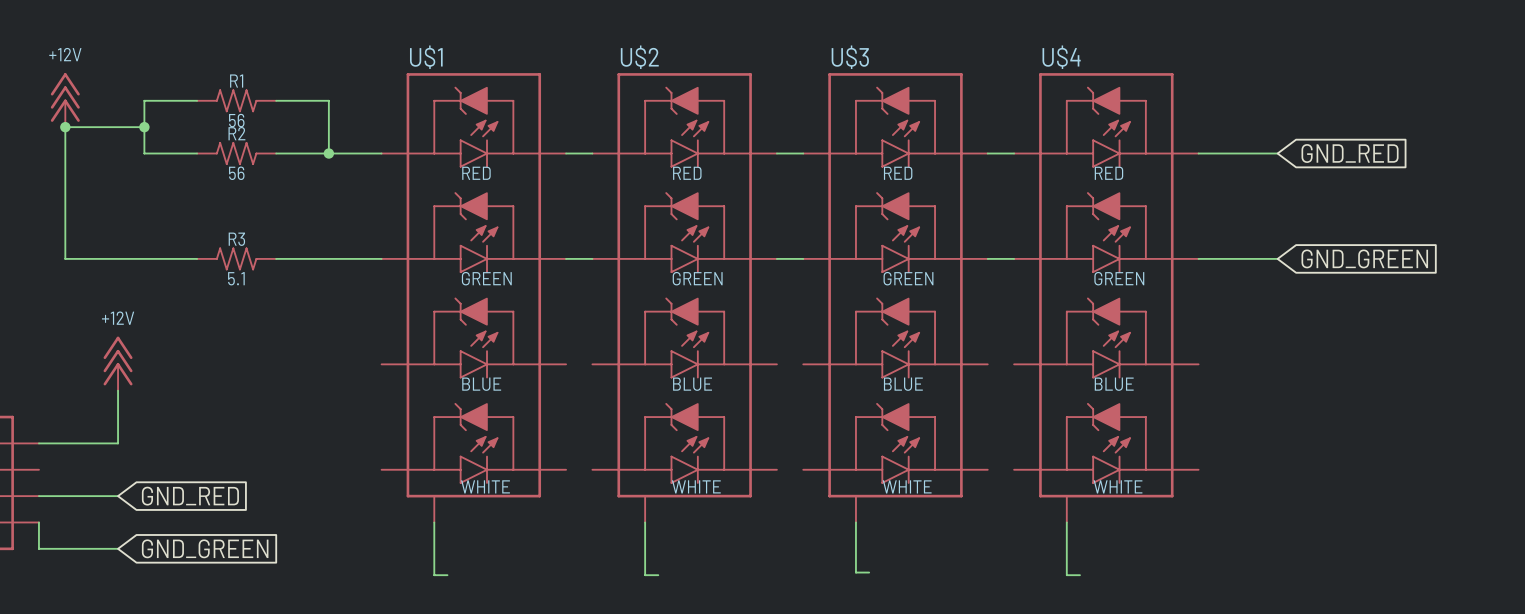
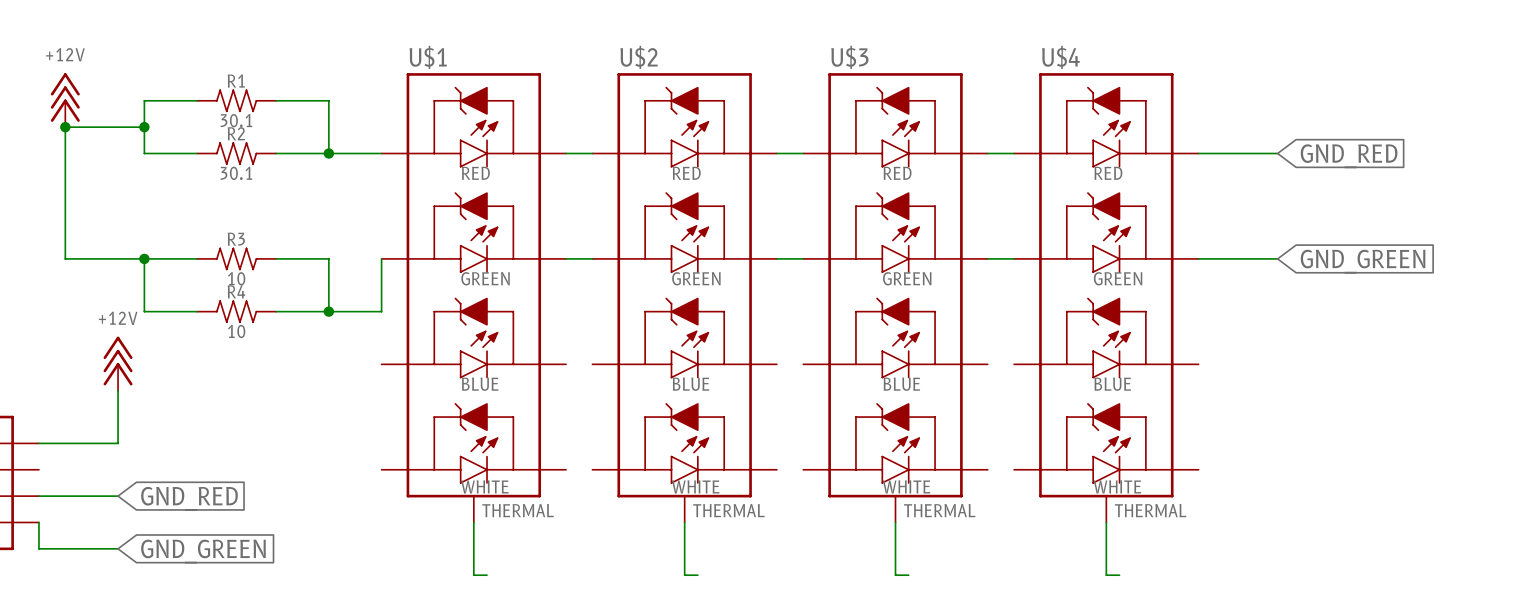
U$1 symbol: [381, 73, 567, 523] -> [381, 73, 567, 523]
U$2 symbol: [592, 73, 777, 523] -> [592, 73, 777, 523]
U$3 symbol: [803, 73, 988, 523] -> [803, 73, 988, 523]
U$4 symbol: [1014, 73, 1199, 523] -> [1014, 73, 1199, 523]
R1 text: 56 (236, 120) -> 30.1 (236, 120)
R2 text: 56 (236, 173) -> 30.1 (236, 173)
wire: none -> (144, 258) (144, 311) (197, 311)
junction: none -> (144, 258)
wire: (328, 258) (381, 258) -> (328, 258) (328, 311)
wire: none -> (381, 258) (381, 311) (276, 311)
R3 text: 5.1 (236, 278) -> 10 (236, 278)
R4: none -> (236, 311)
junction: none -> (328, 311)
wire: (434, 522) (434, 575) (447, 575) -> (473, 522) (473, 575) (487, 575)
wire: (645, 522) (645, 575) (658, 575) -> (684, 522) (684, 575) (697, 575)
wire: (855, 522) (855, 572) (869, 572) -> none
wire: none -> (895, 522) (895, 575) (908, 575)
wire: (1066, 522) (1066, 575) (1079, 575) -> (1106, 522) (1106, 575) (1119, 575)

